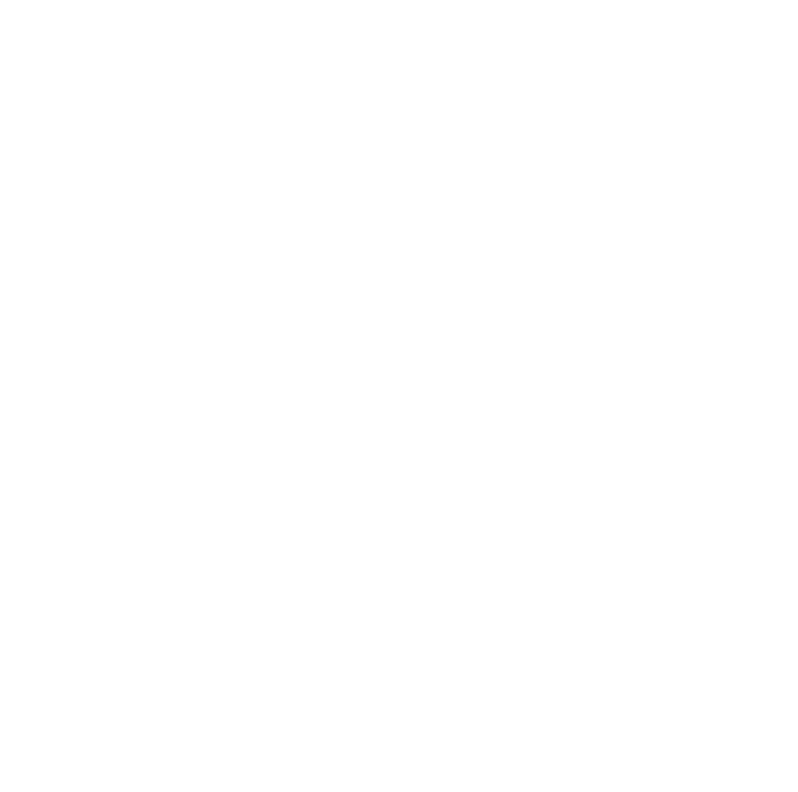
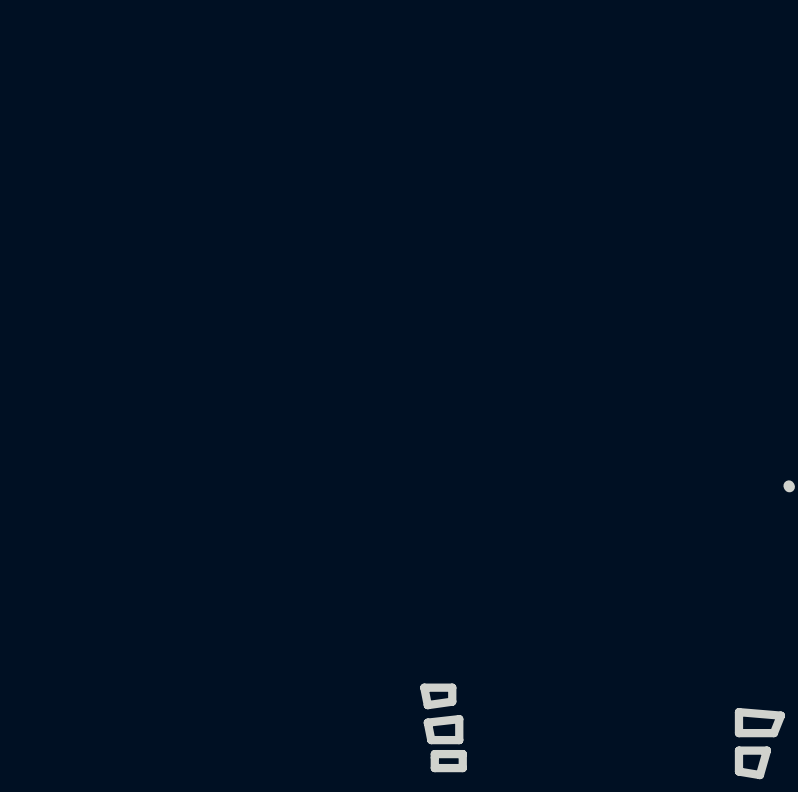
board edge: none -> (788, 485) (789, 486)
board edge: none -> (424, 687) (452, 687) (452, 701) (427, 705) (424, 687)
board edge: none -> (738, 712) (780, 715) (773, 733) (738, 733) (738, 712)
board edge: none -> (459, 719) (427, 722) (431, 740) (459, 740) (459, 719)
board edge: none -> (738, 750) (738, 771) (759, 775) (766, 750) (738, 750)
board edge: none -> (434, 754) (434, 768) (462, 768) (462, 754) (434, 754)

